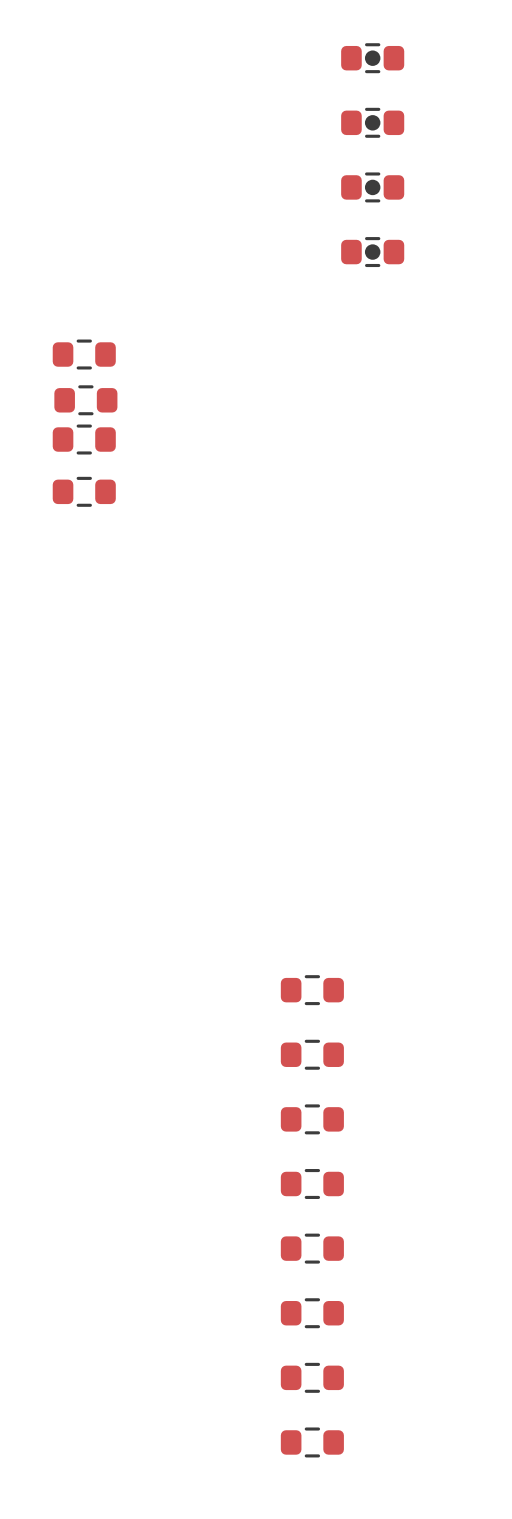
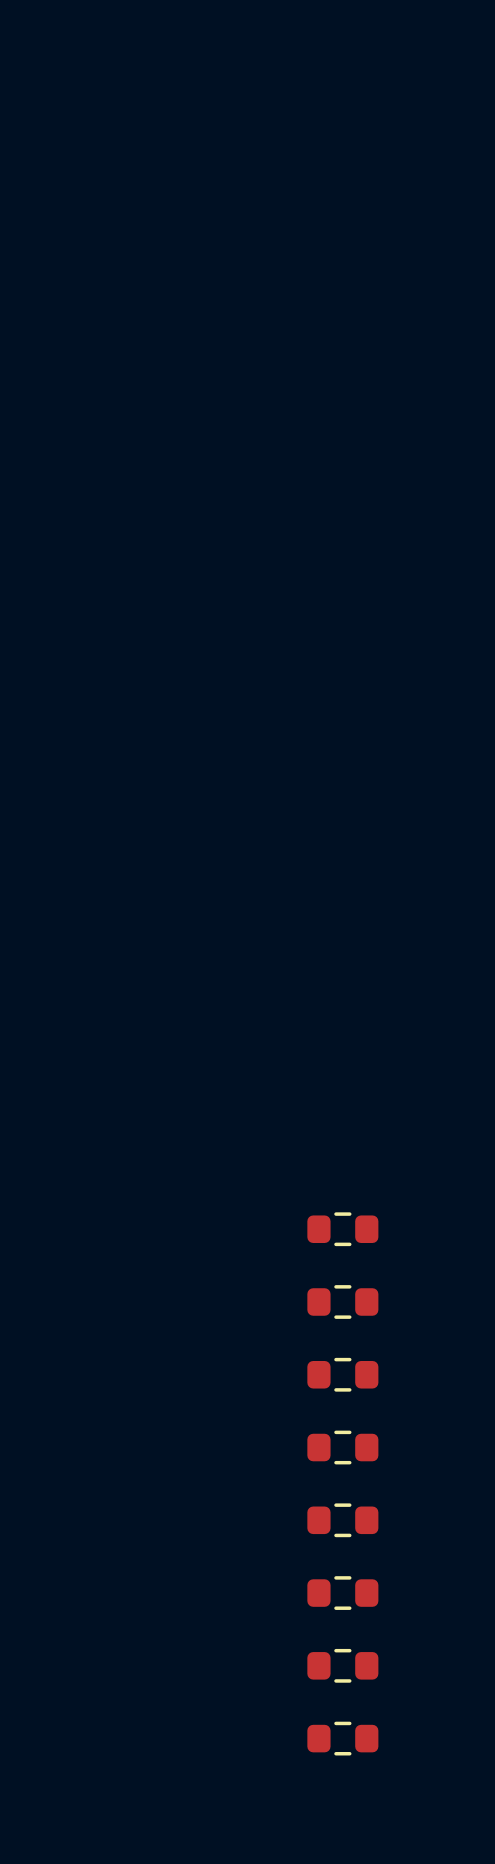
part: (372, 58) -> none
part: (372, 122) -> none
part: (372, 187) -> none
part: (372, 252) -> none
part: (84, 354) -> none
part: (85, 400) -> none
part: (84, 439) -> none
part: (84, 491) -> none

